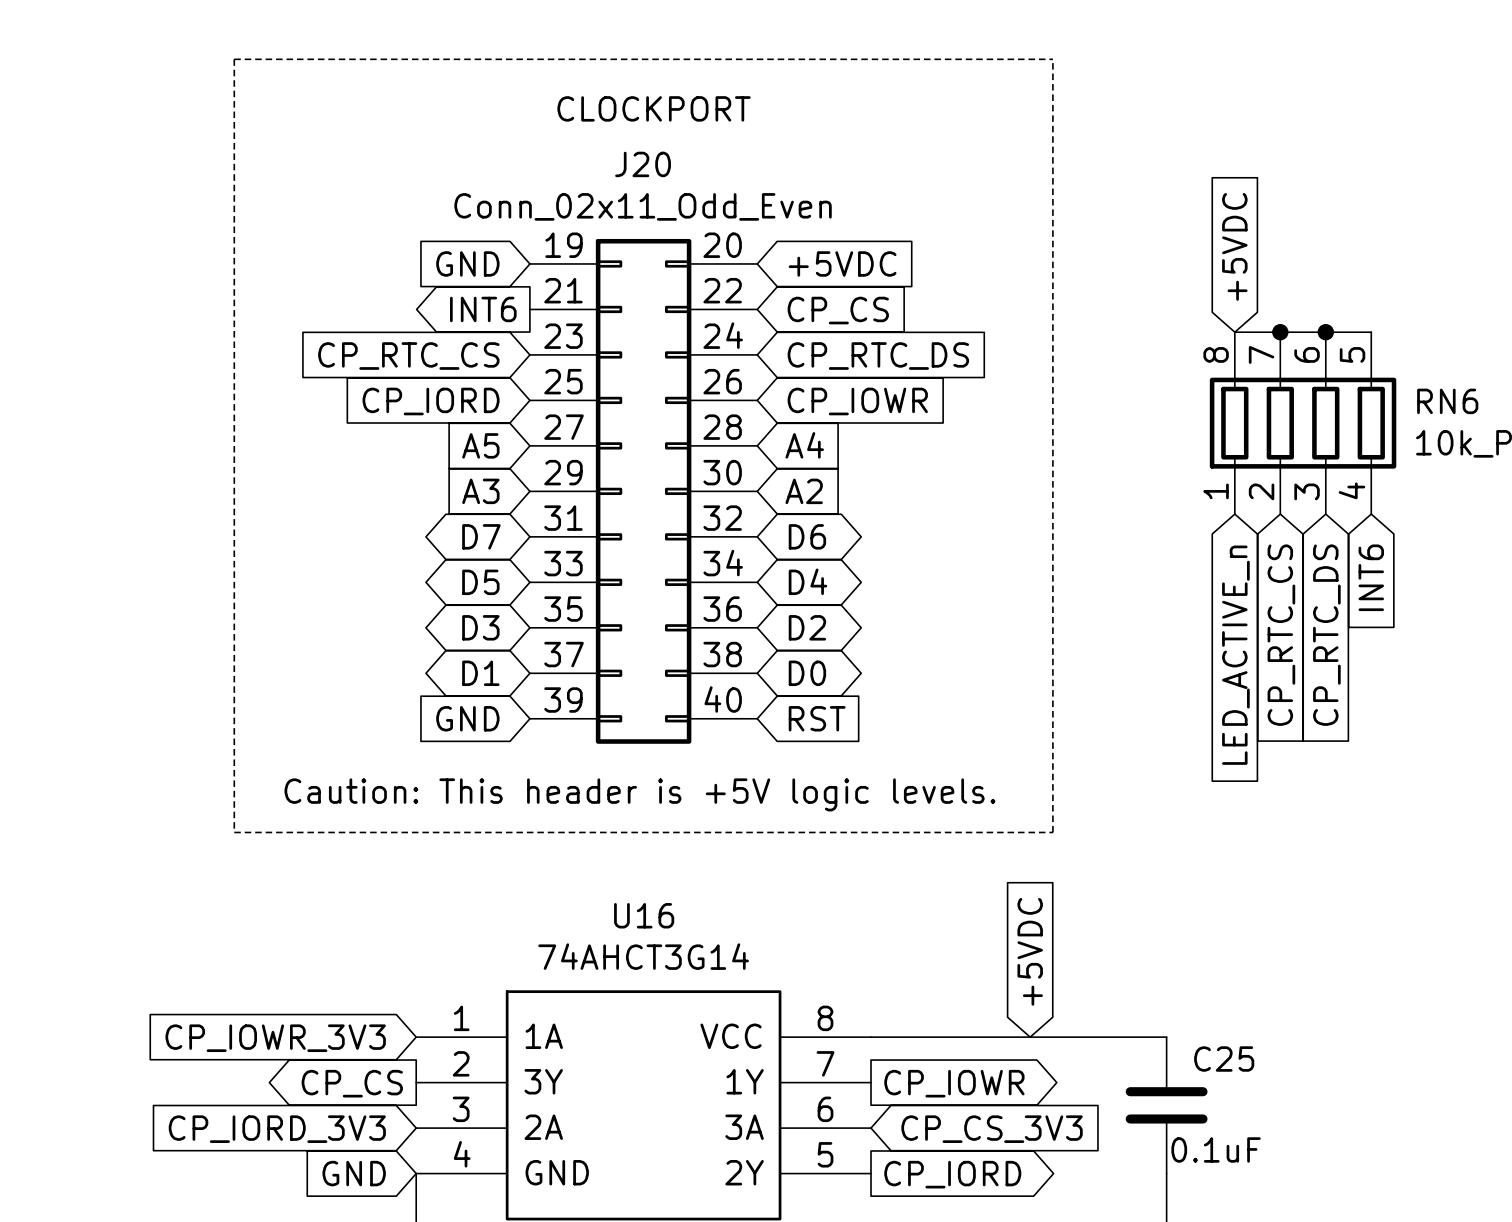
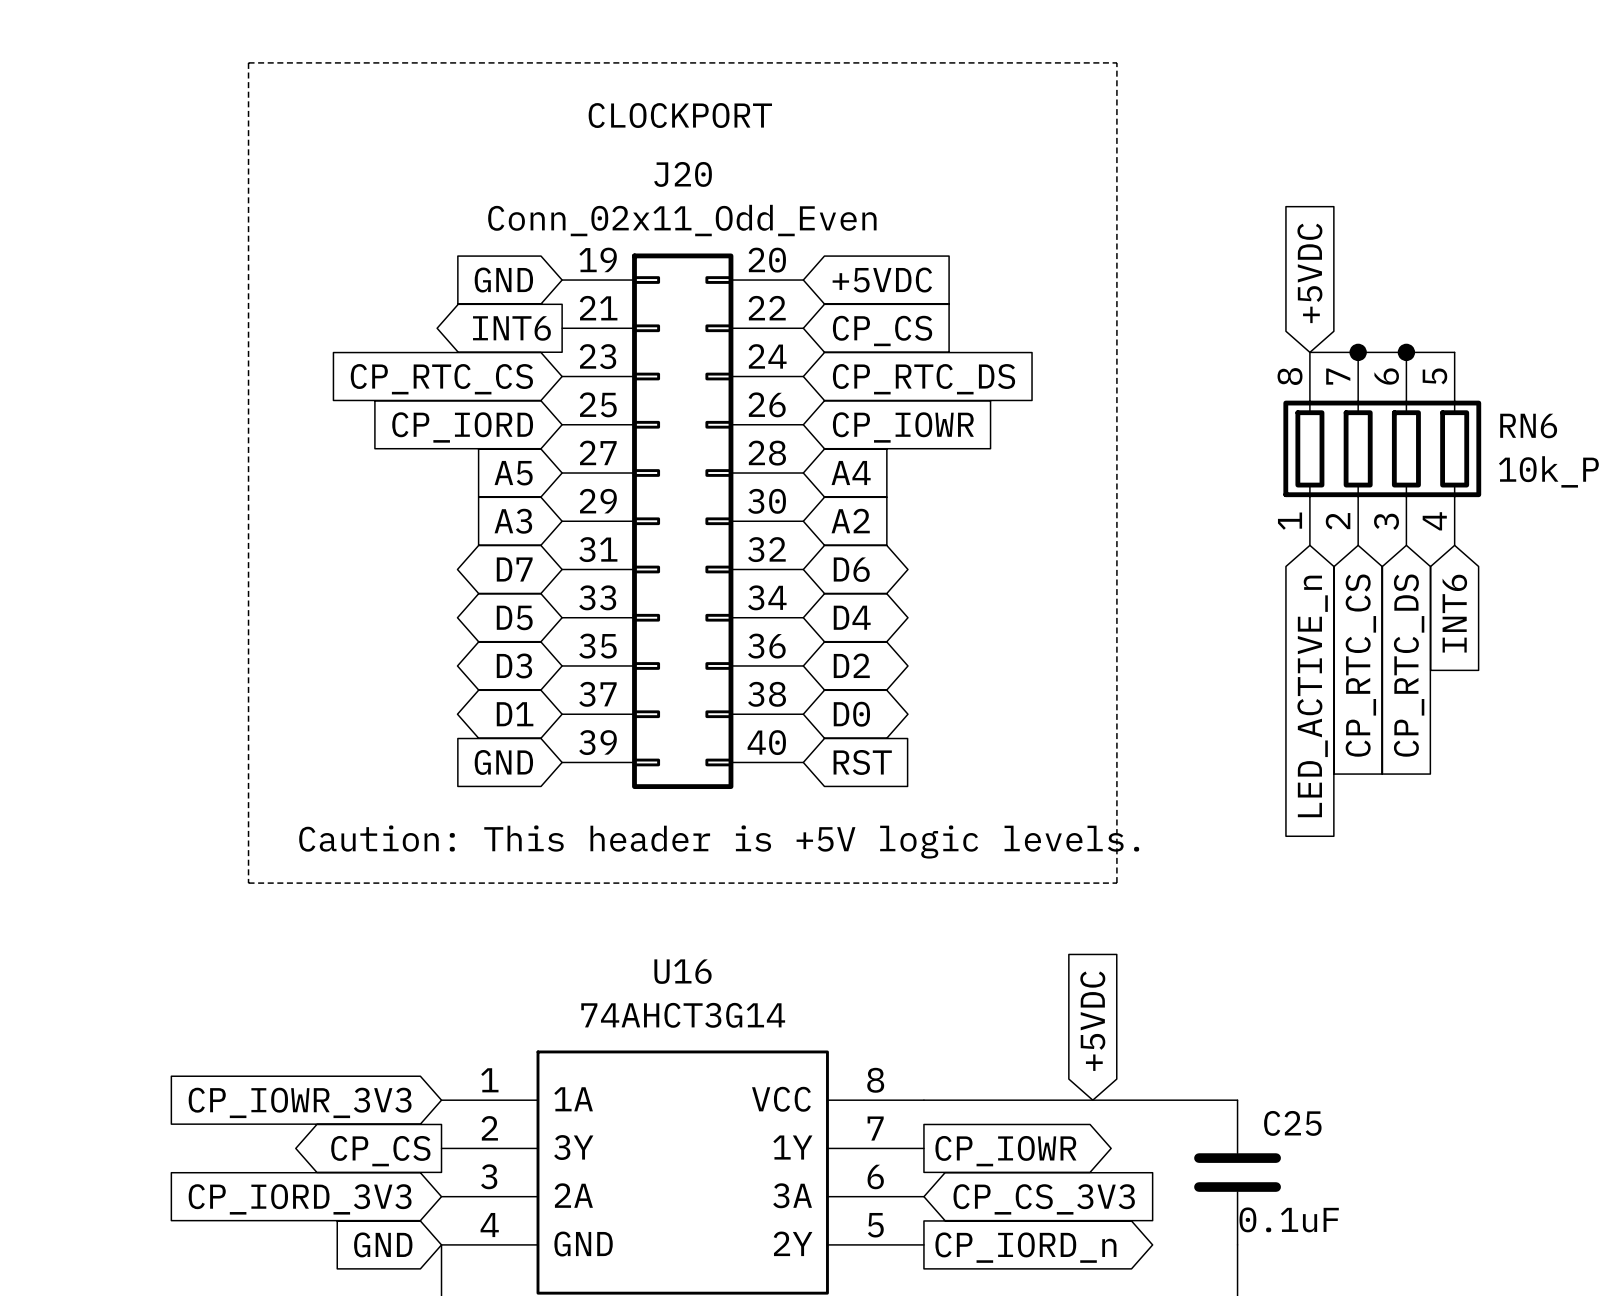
global label: CP_IORD (952, 1174) -> CP_IORD_n (1025, 1247)

